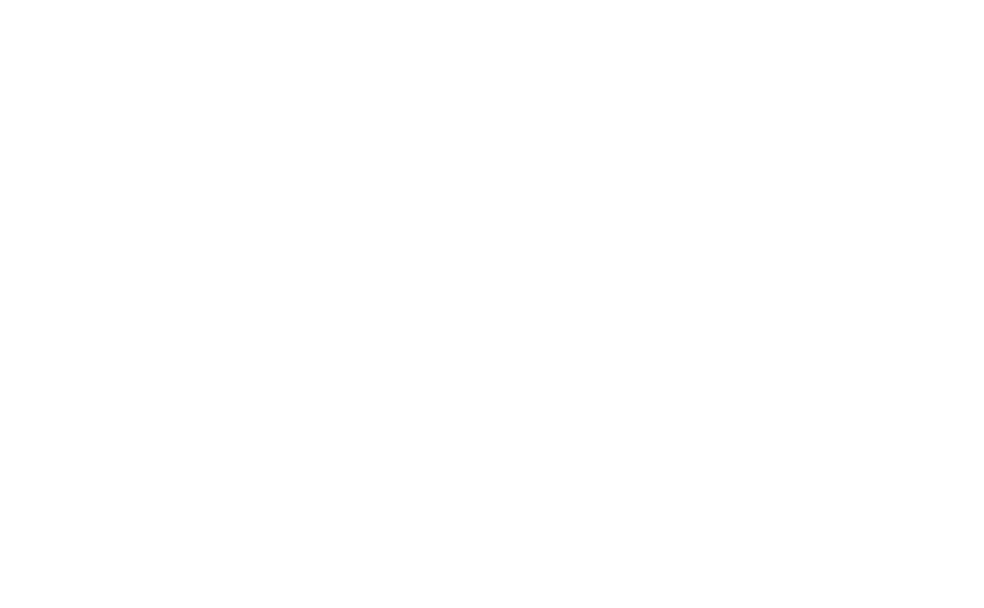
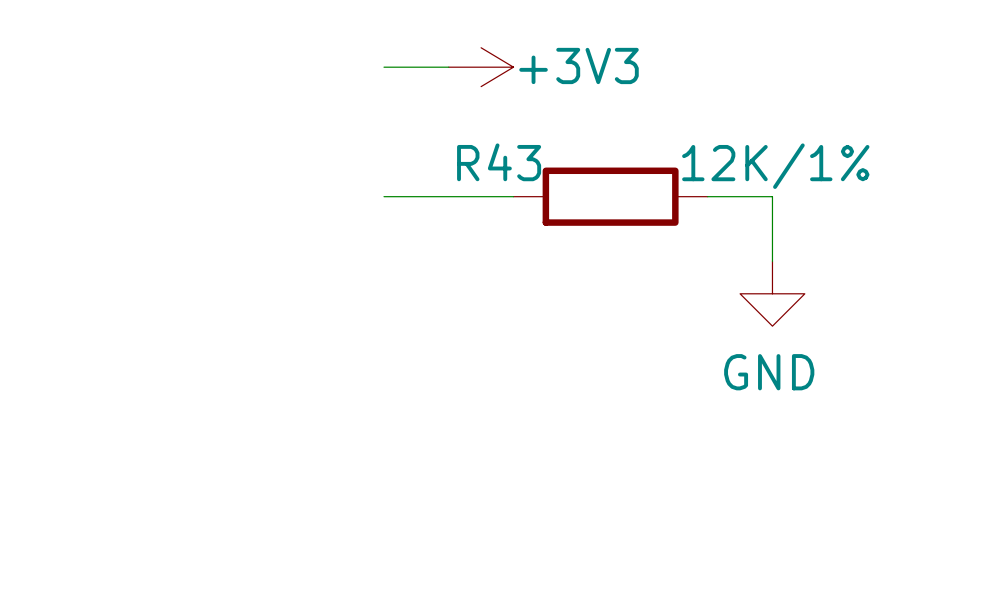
wire: none -> (384, 67) (448, 67)
power symbol: none -> +3V3 (481, 67)
wire: none -> (384, 196) (513, 196)
R43: none -> 12K/1% (610, 196)
wire: none -> (707, 196) (772, 196) (772, 261)
power symbol: none -> GND (772, 293)

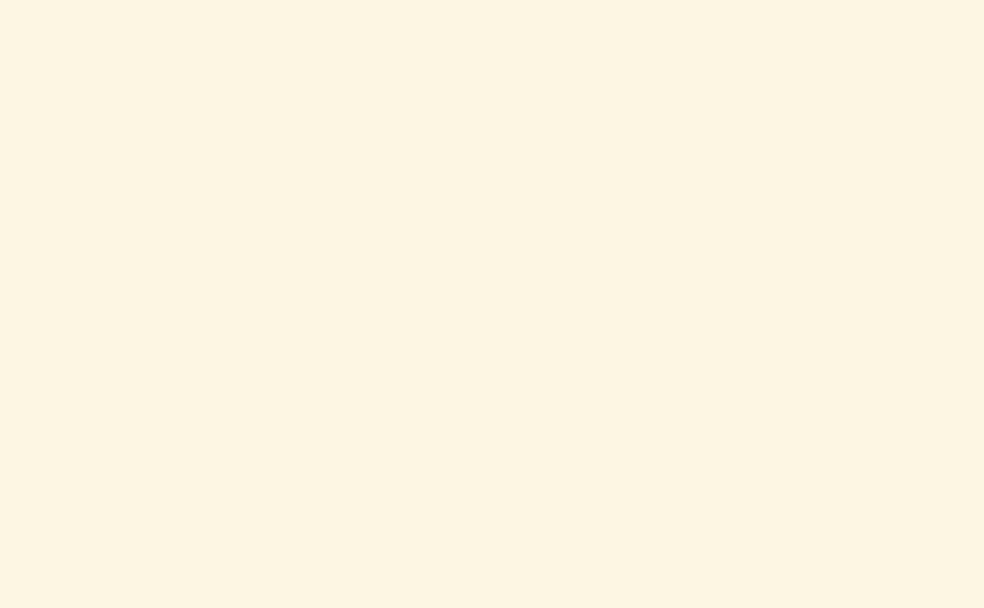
wire: (384, 67) (448, 67) -> none
power symbol: +3V3 (481, 67) -> none
wire: (384, 196) (513, 196) -> none
R43: 12K/1% (610, 196) -> none
wire: (707, 196) (772, 196) (772, 261) -> none
power symbol: GND (772, 293) -> none

